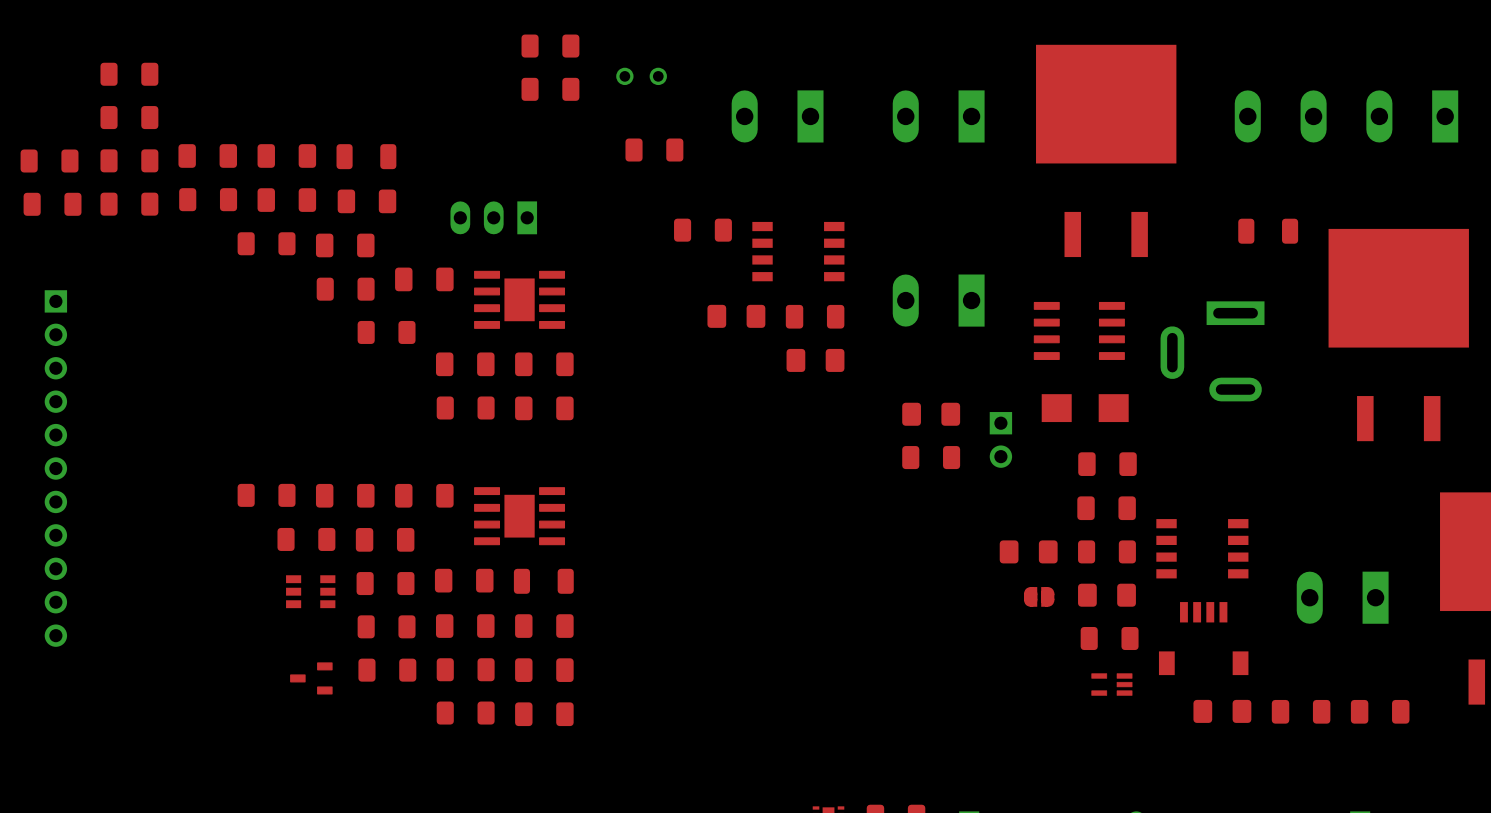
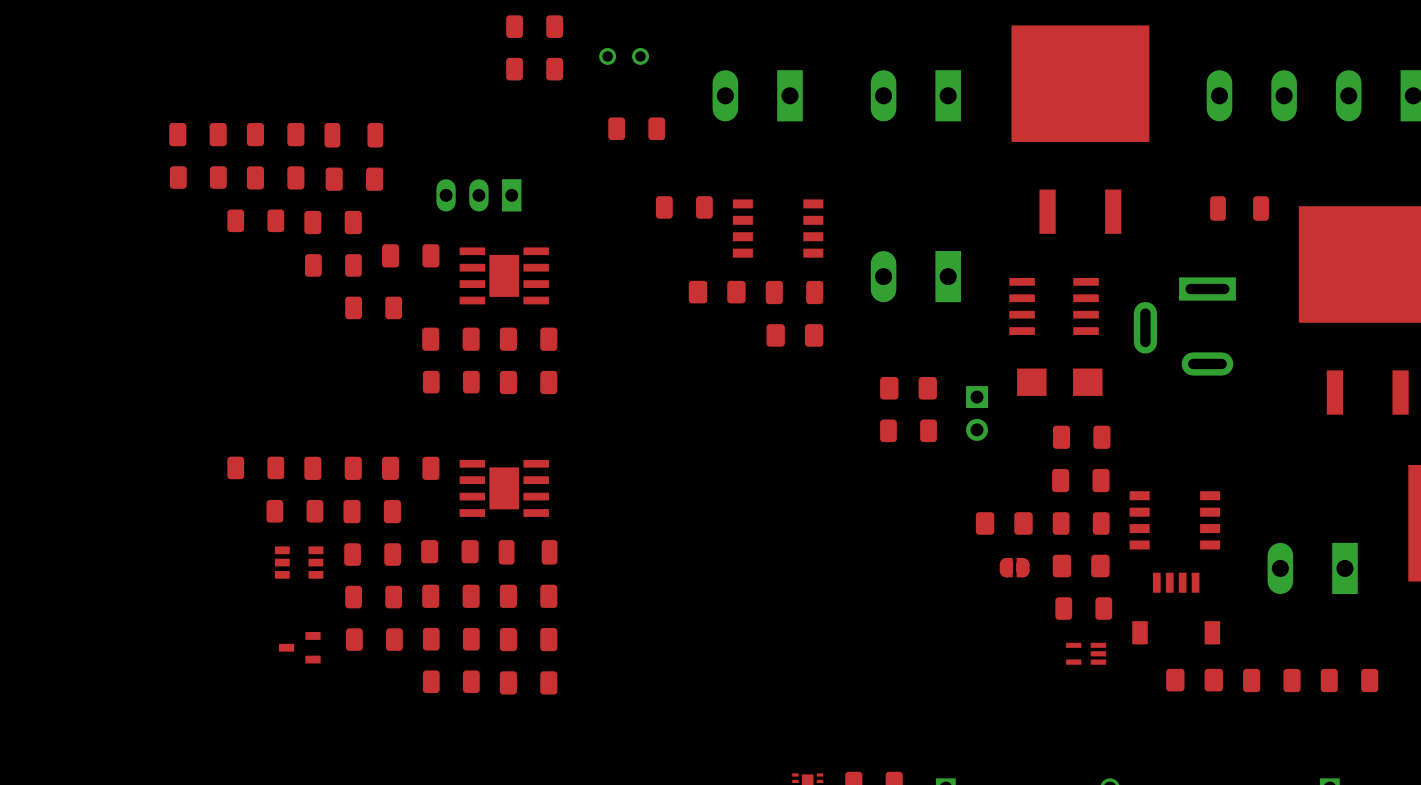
part: (129, 74) -> none
part: (129, 117) -> none
part: (129, 160) -> none
part: (49, 161) -> none
part: (52, 204) -> none
part: (129, 204) -> none
part: (55, 468) -> none

